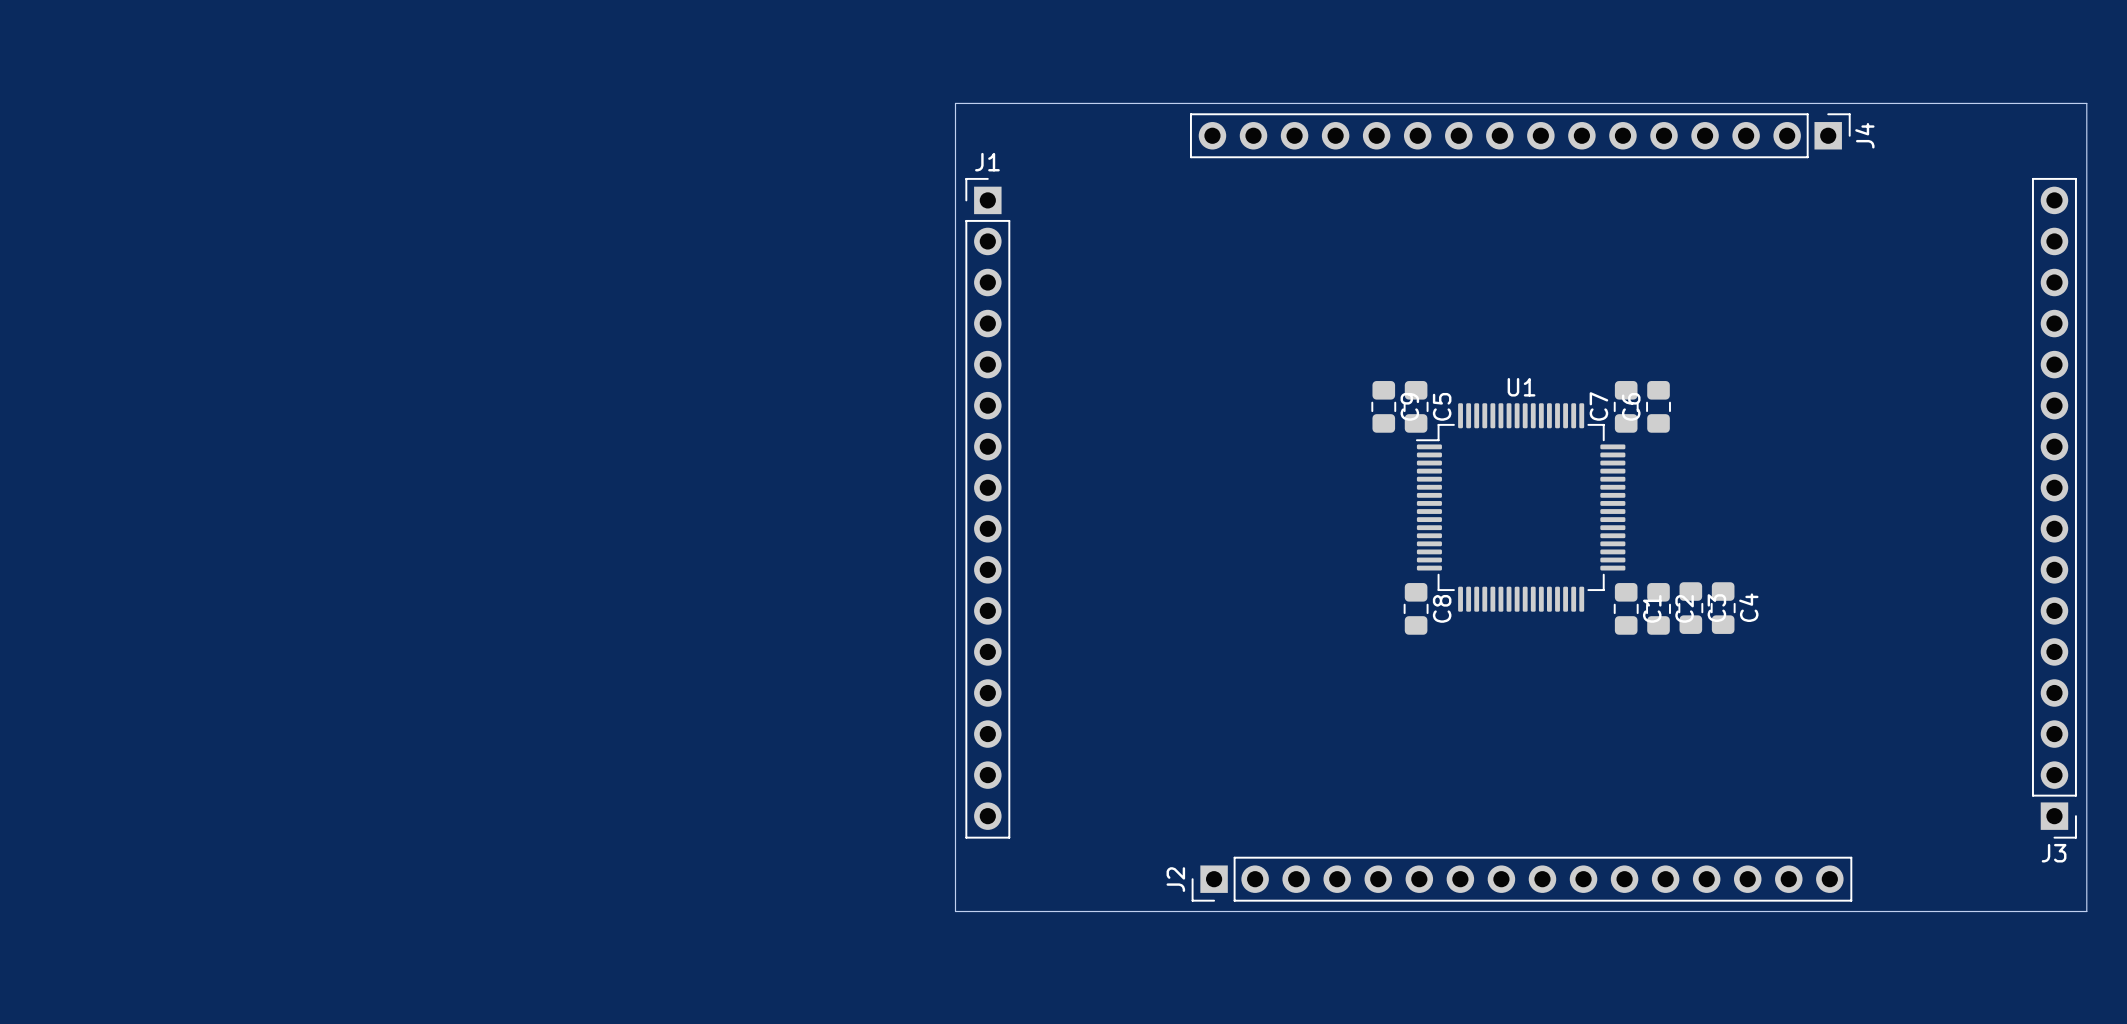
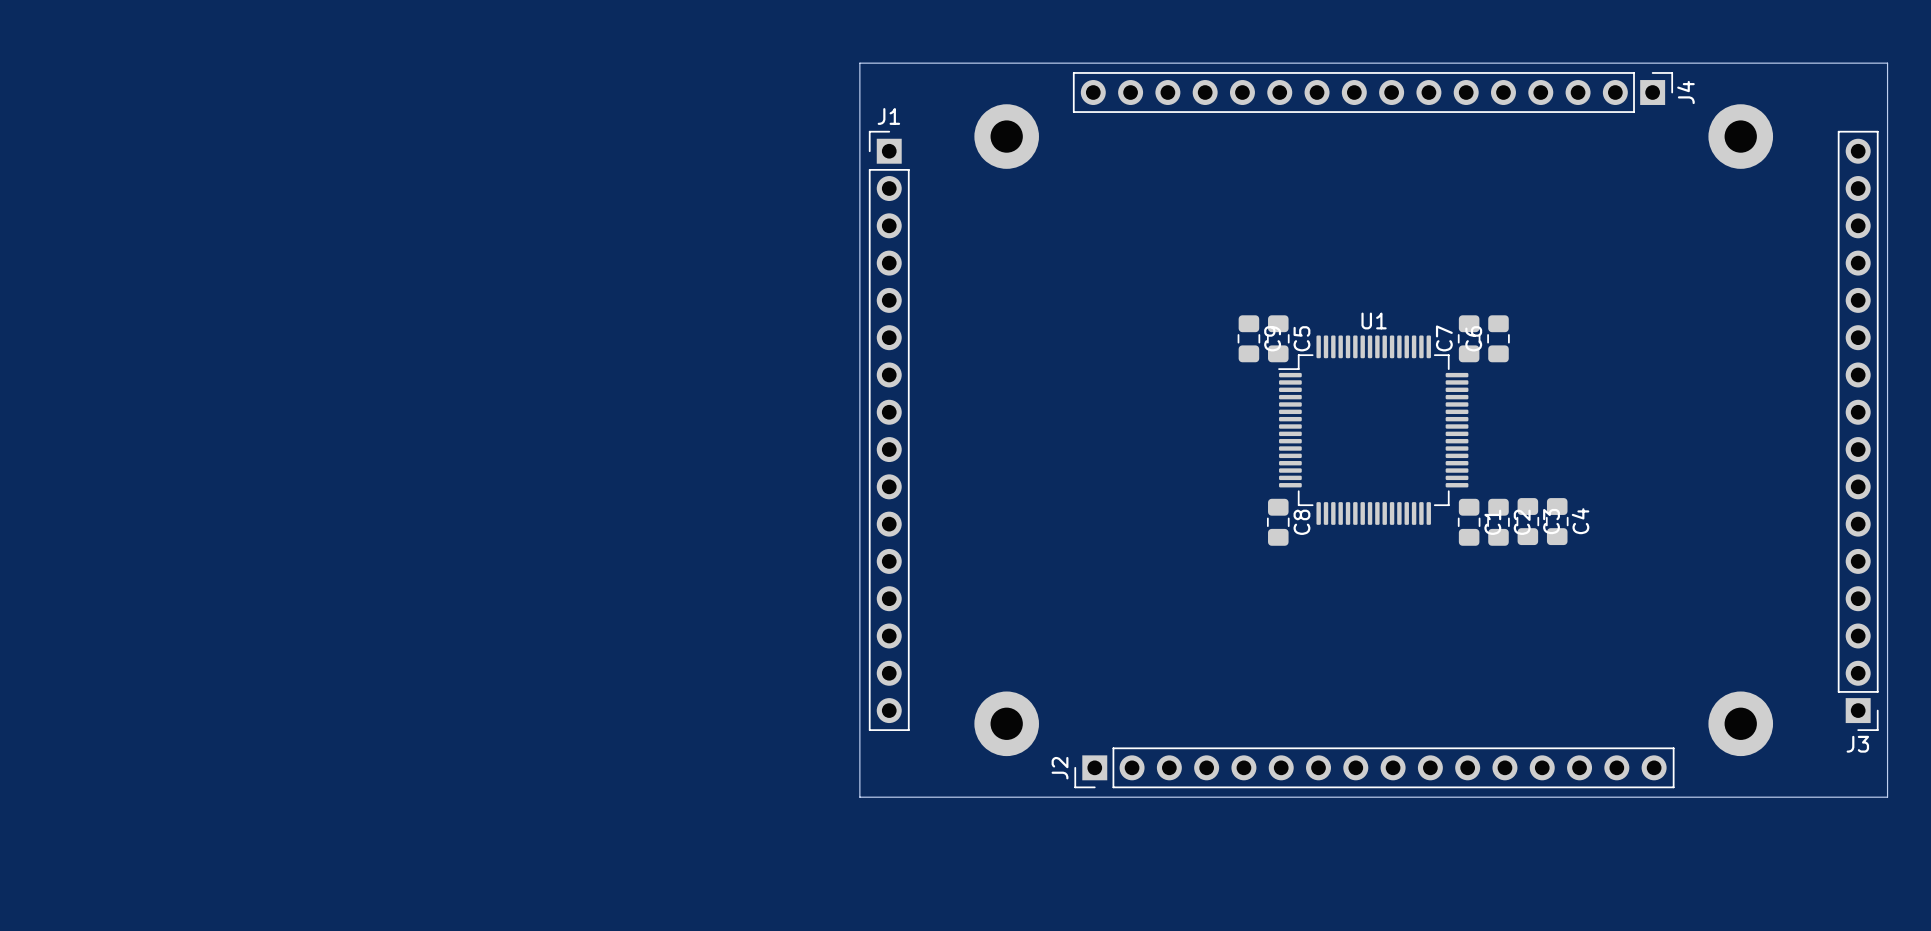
part: none -> (1006, 136)
part: none -> (1740, 136)
part: none -> (1006, 723)
part: none -> (1740, 723)

